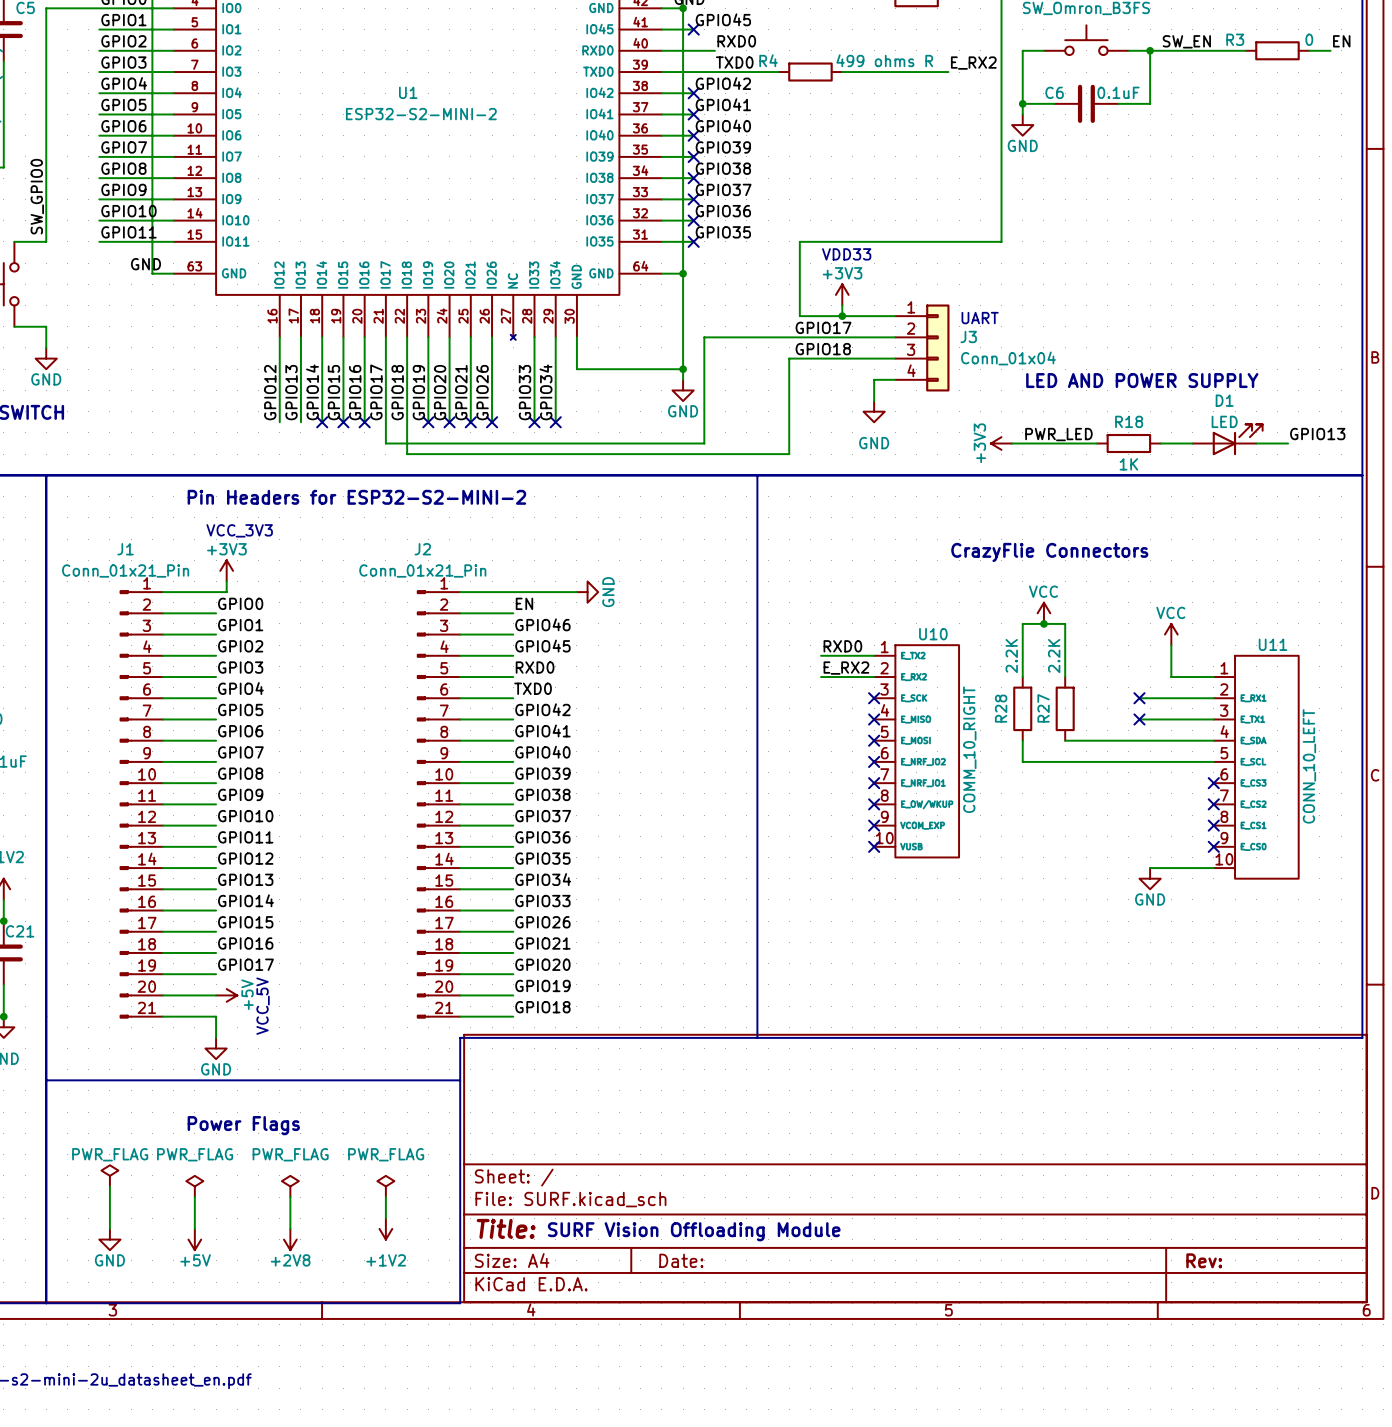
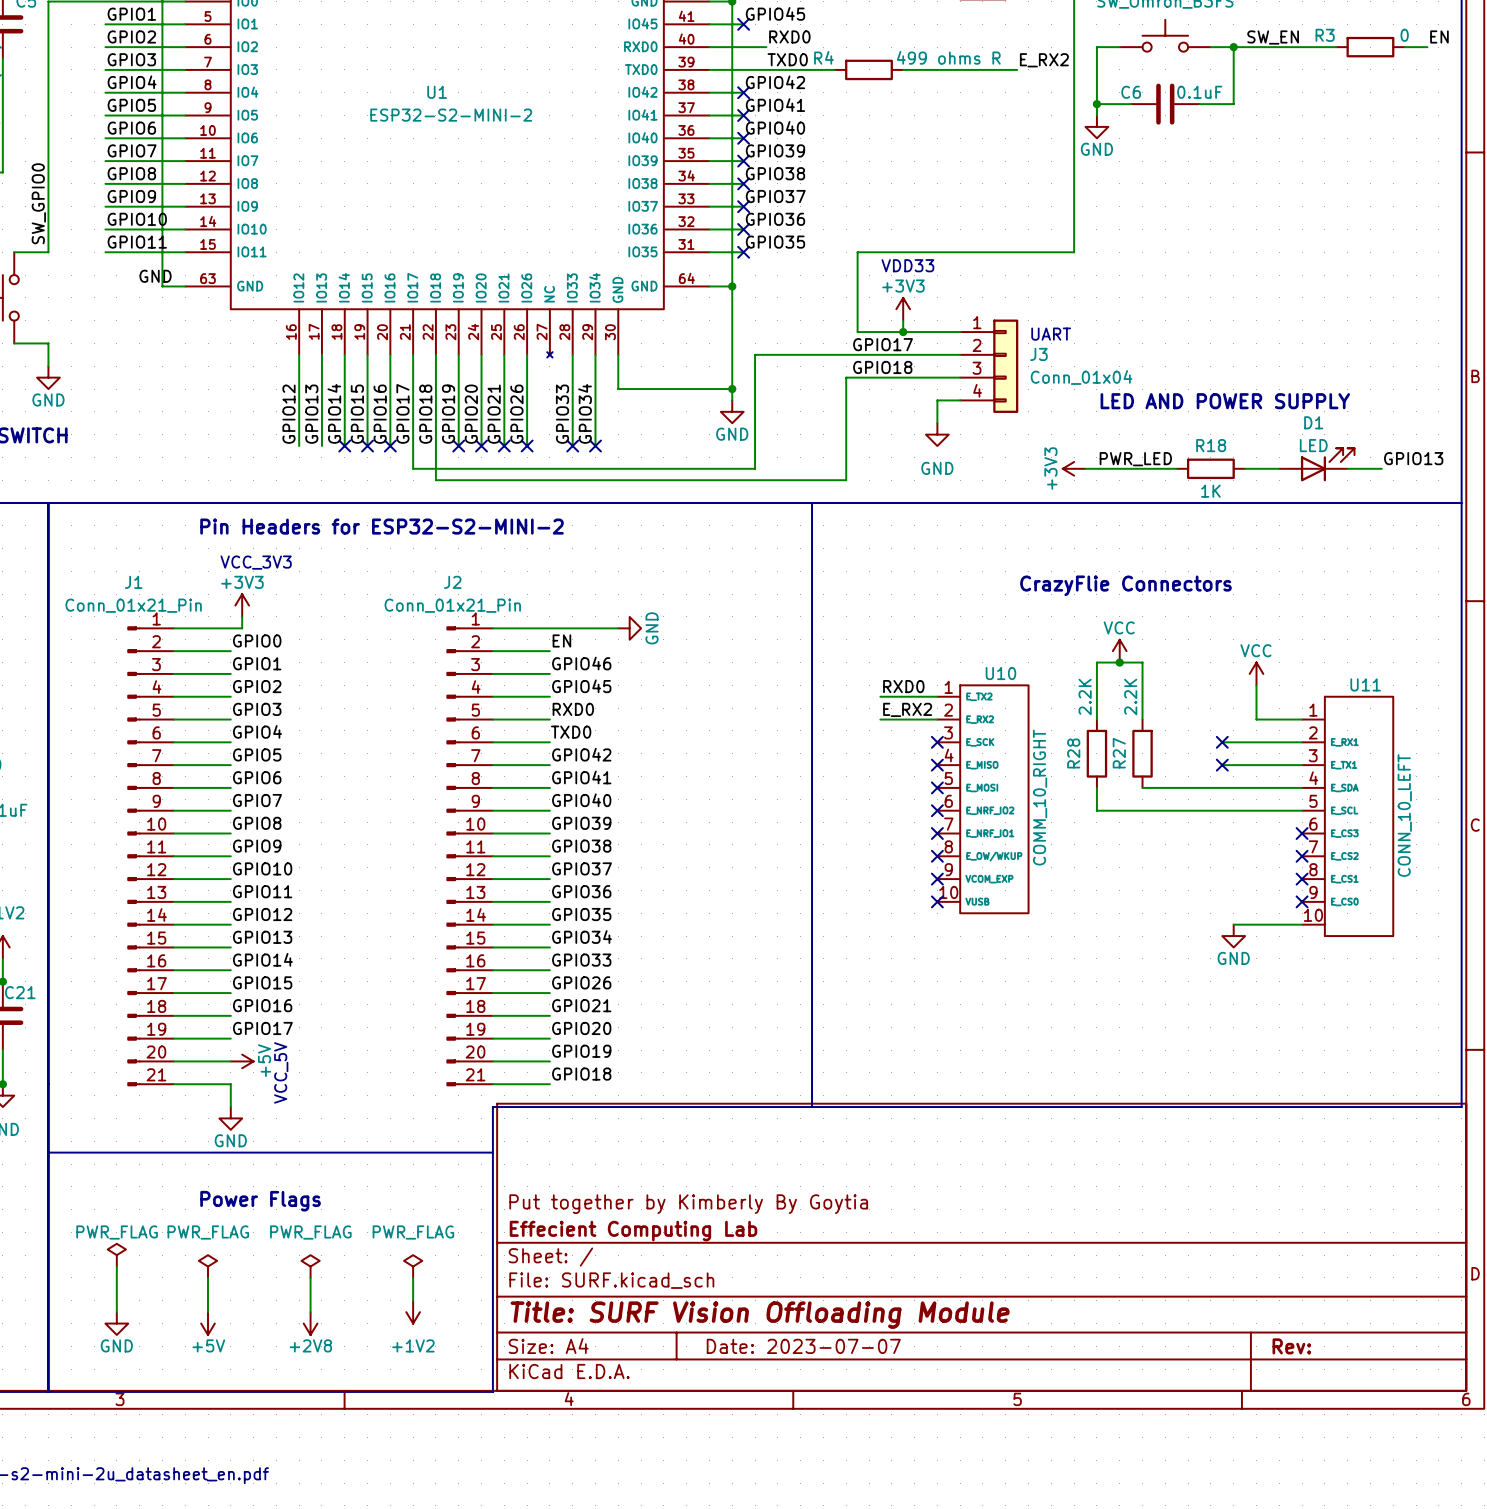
title block: none -> Put together by Kimberly By Goytia (688, 1204)
title block: none -> Effecient Computing Lab (633, 1231)
title block: Title: (506, 1228) -> Title: SURF Vision Offloading Module (760, 1315)
text: SURF Vision Offloading Module (694, 1231) -> none
title block: Date: (681, 1260) -> Date: 2023-07-07 (803, 1346)

